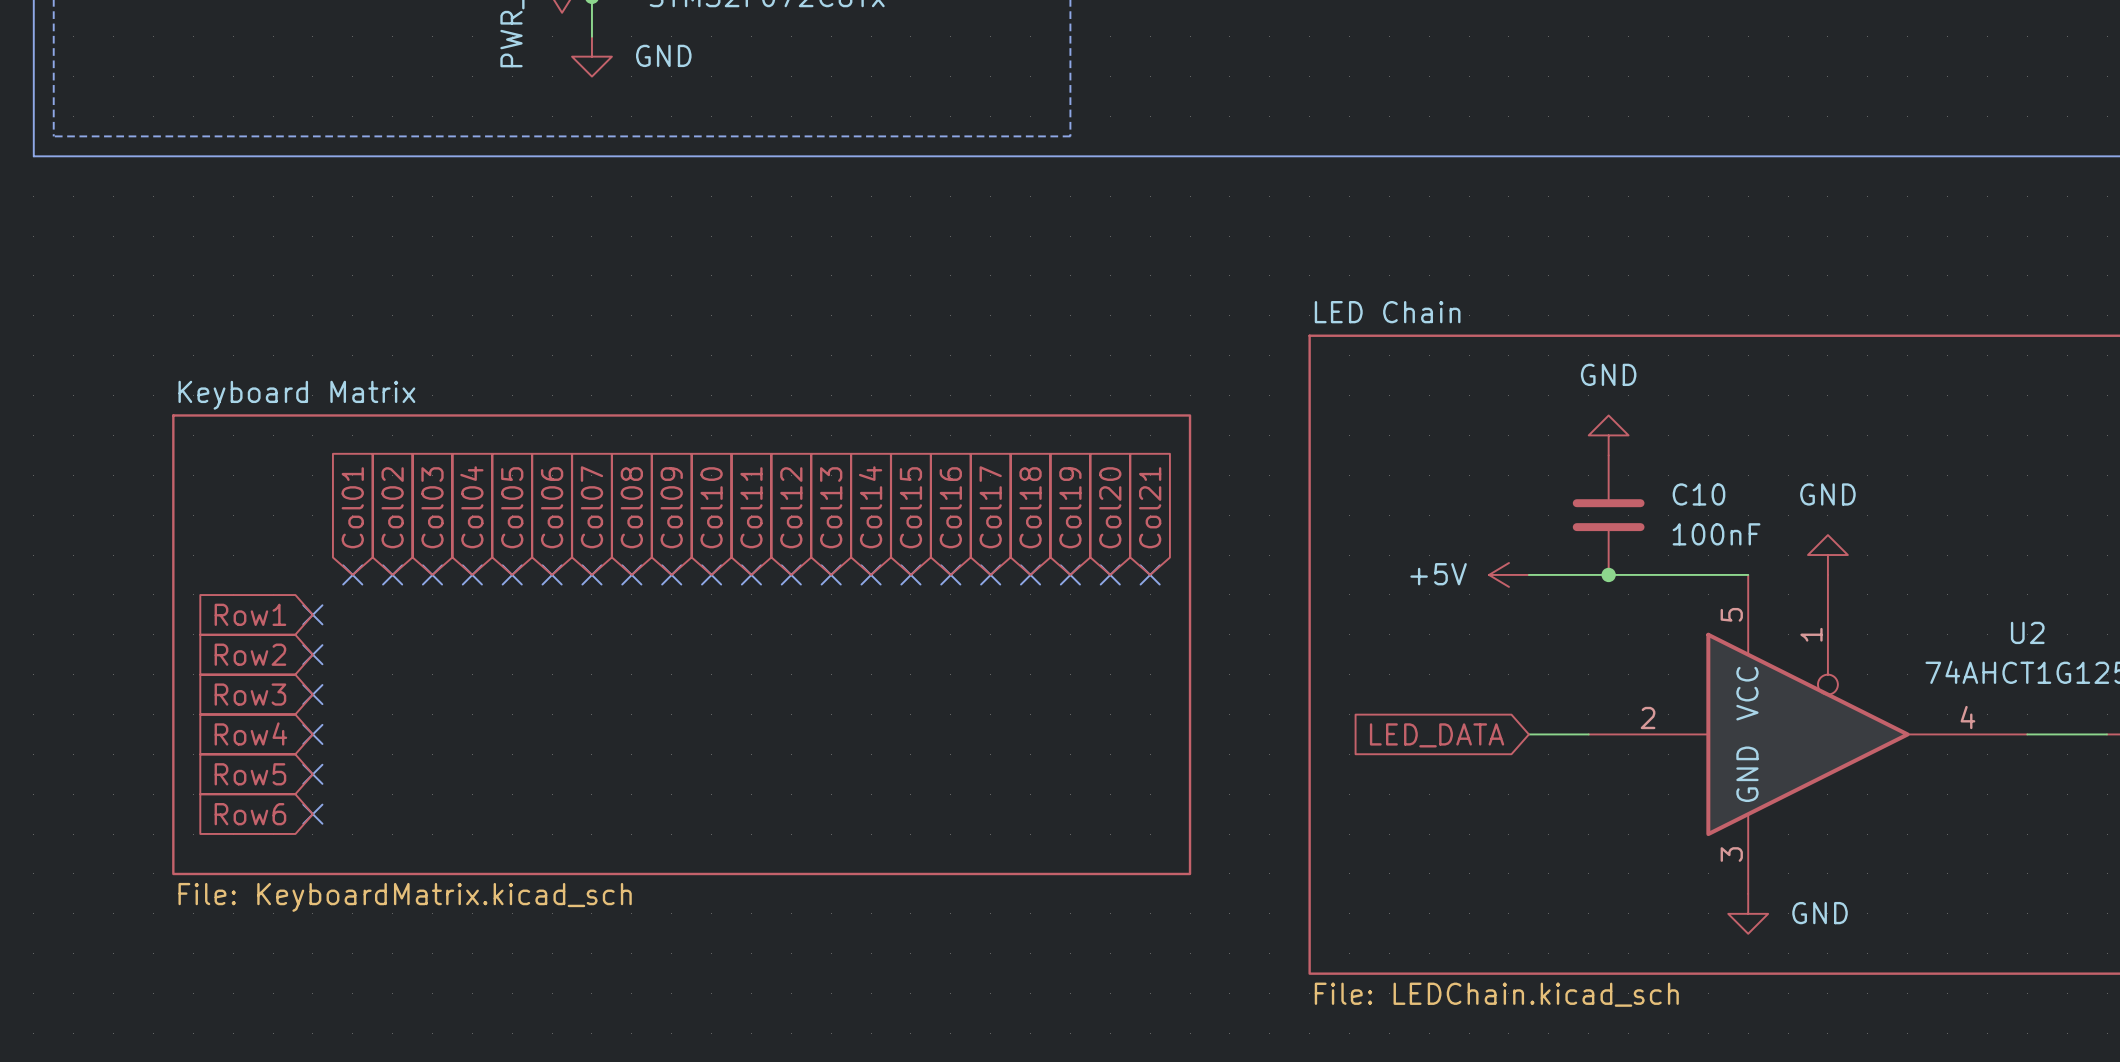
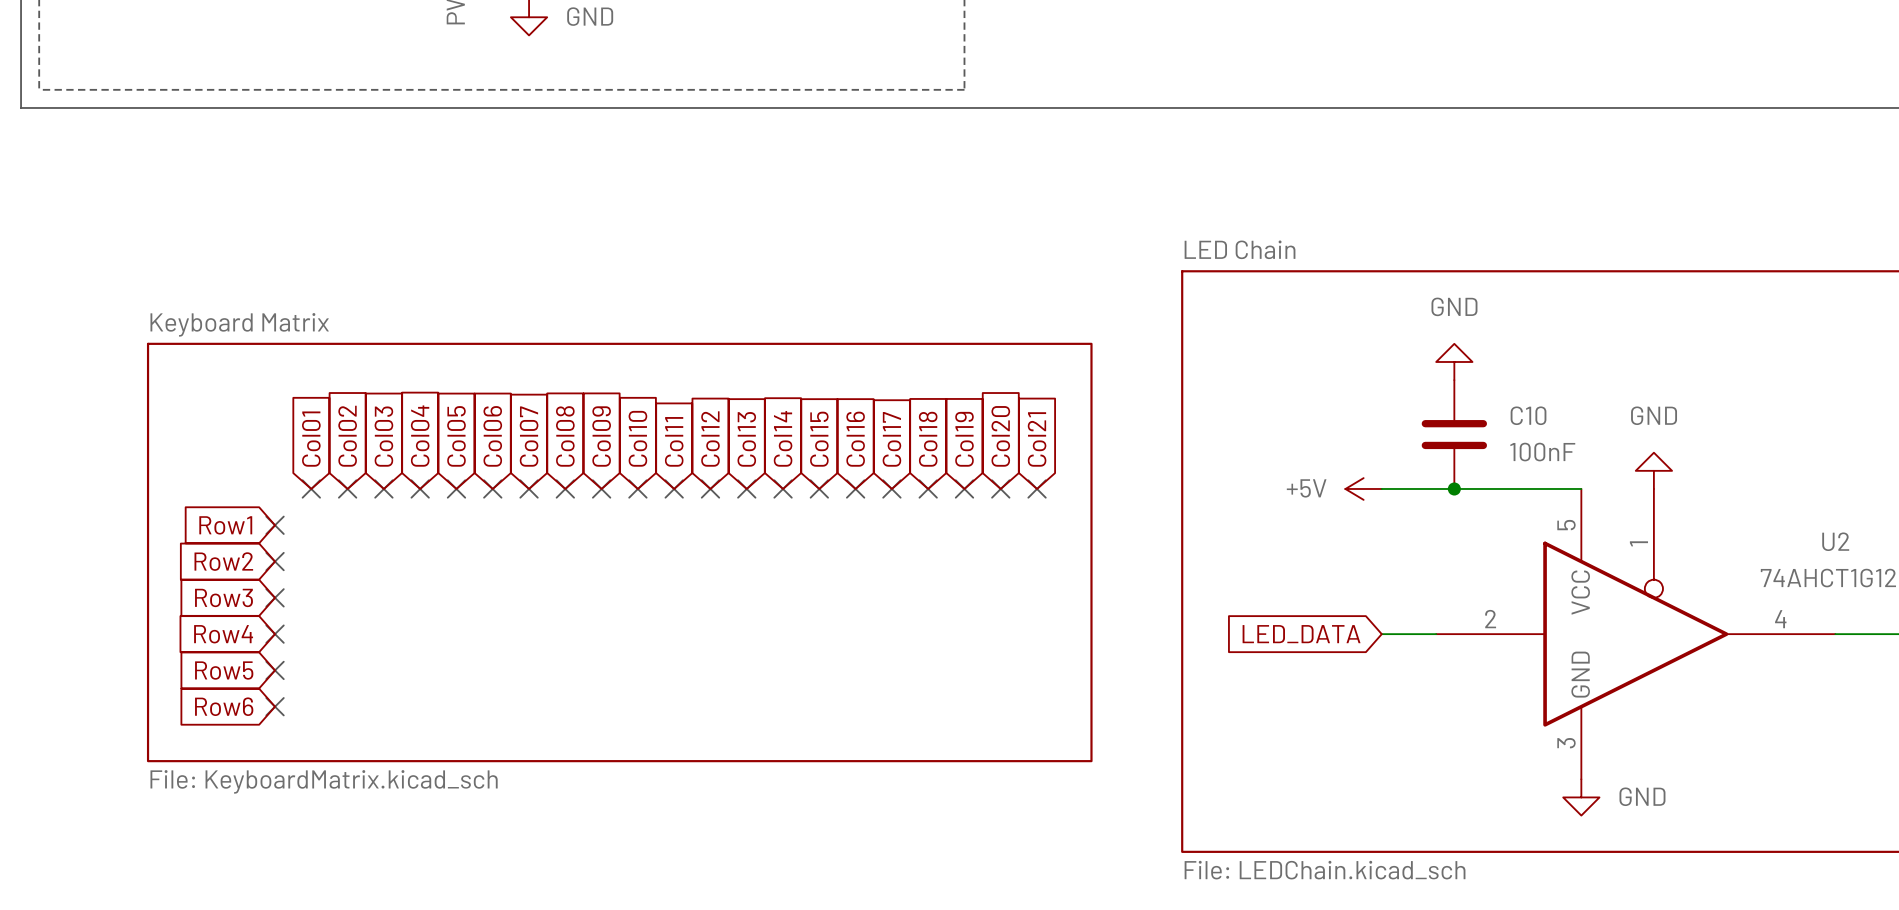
sheet Keyboard Matrix shape: [172, 414, 1192, 876] -> [146, 342, 1093, 763]

